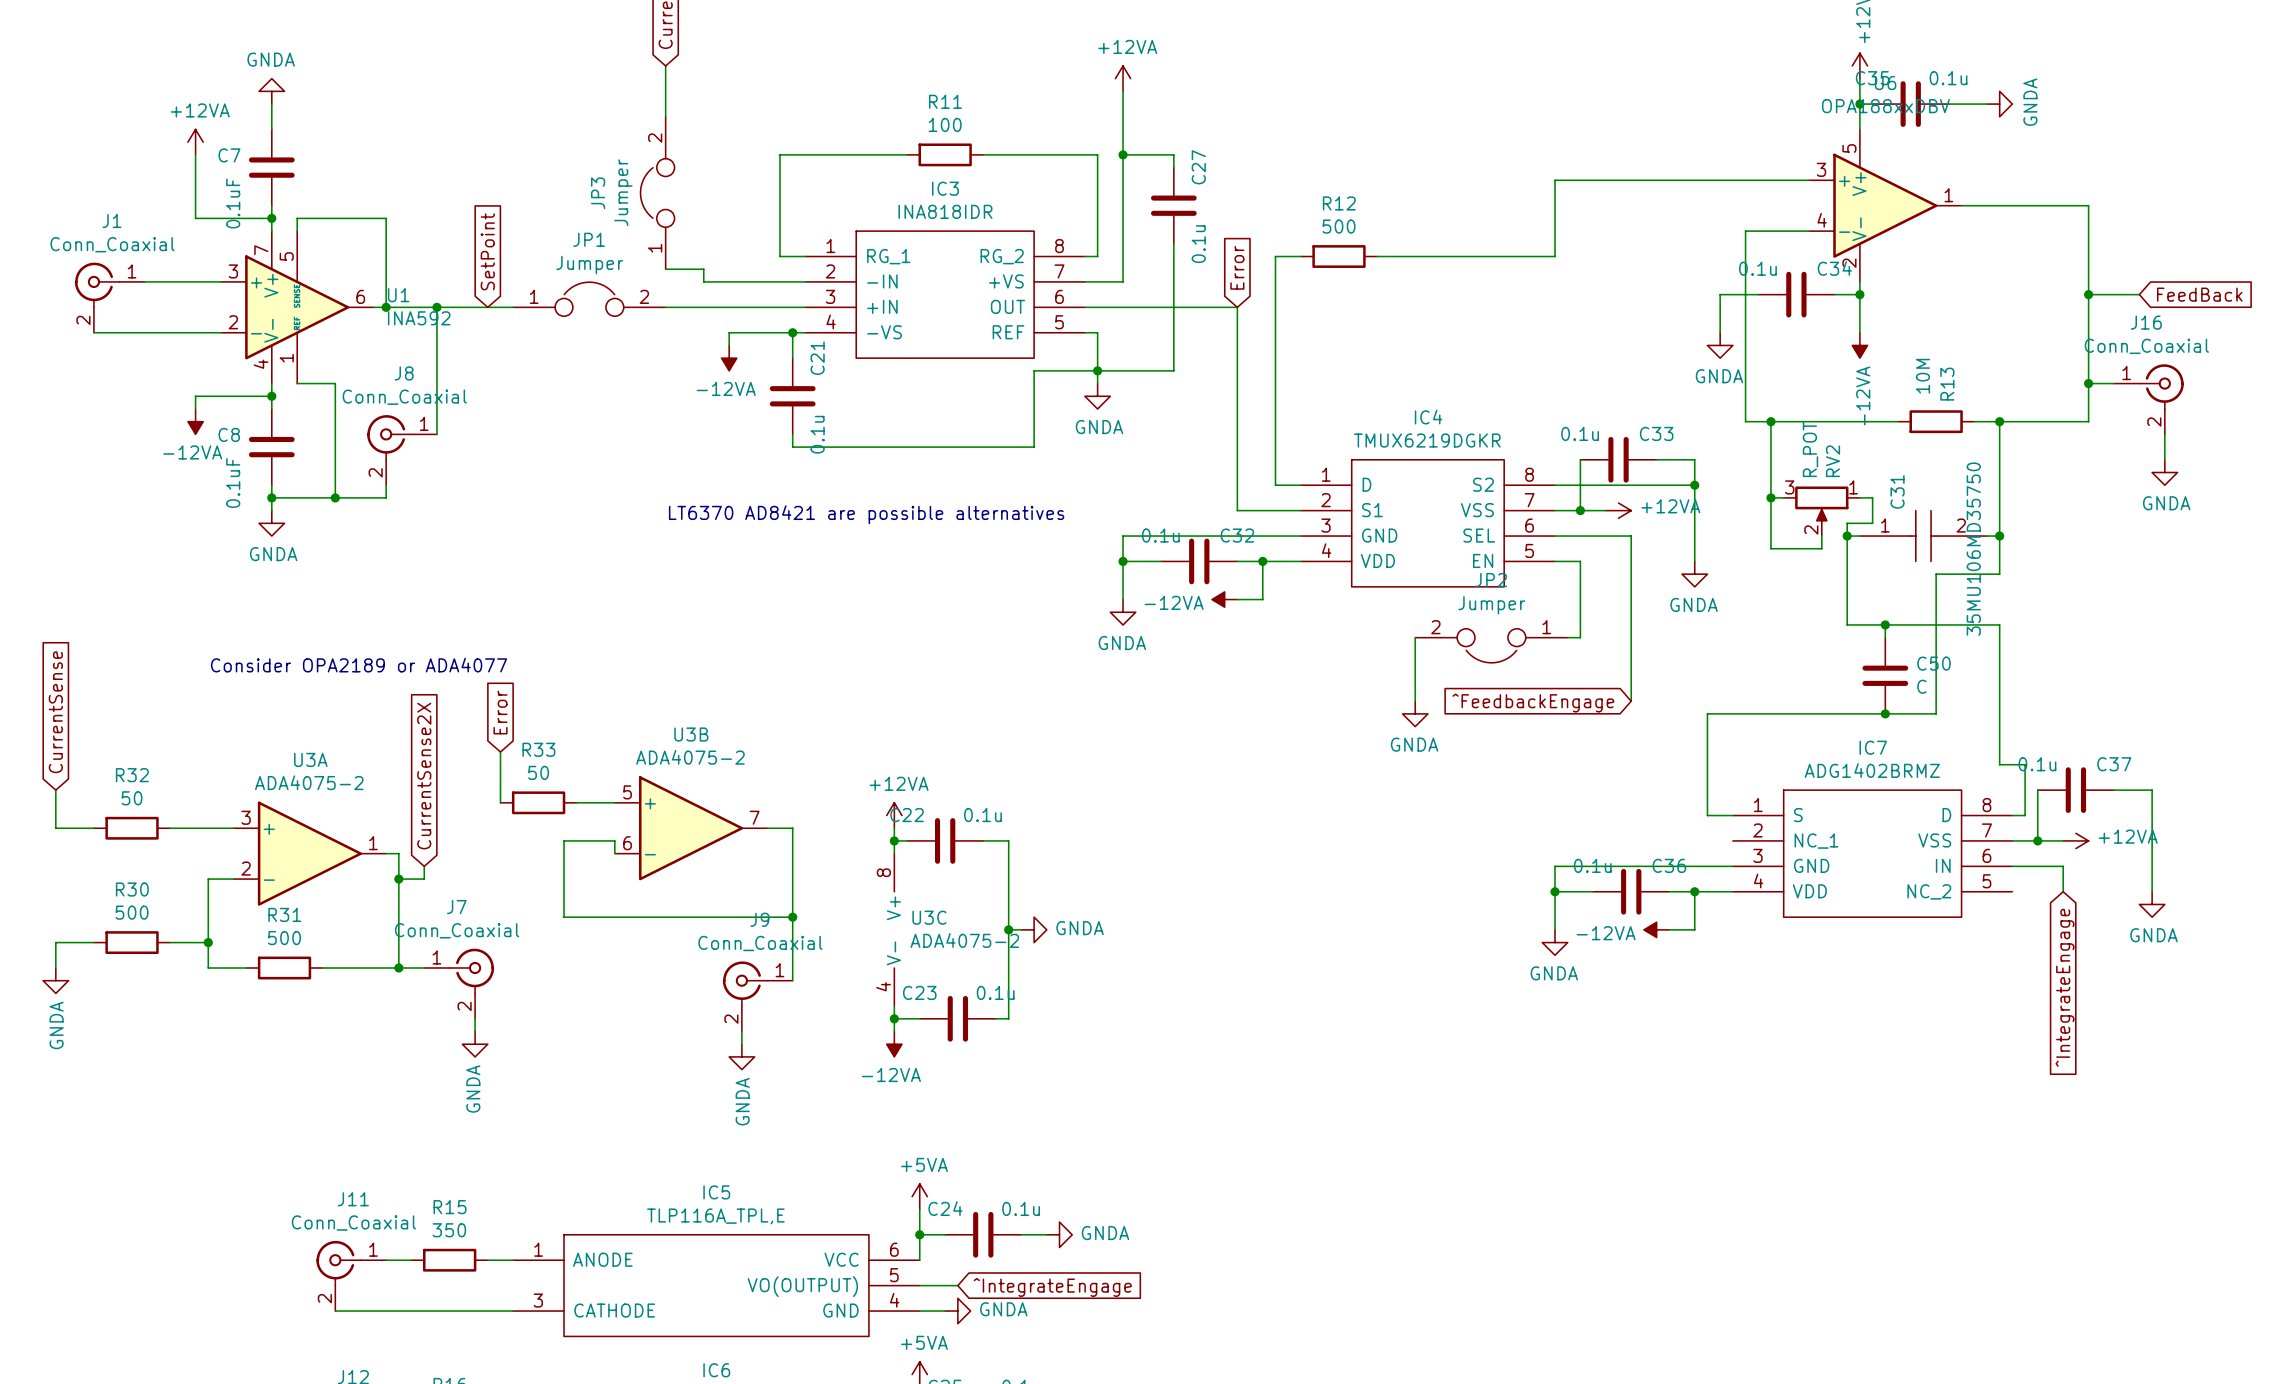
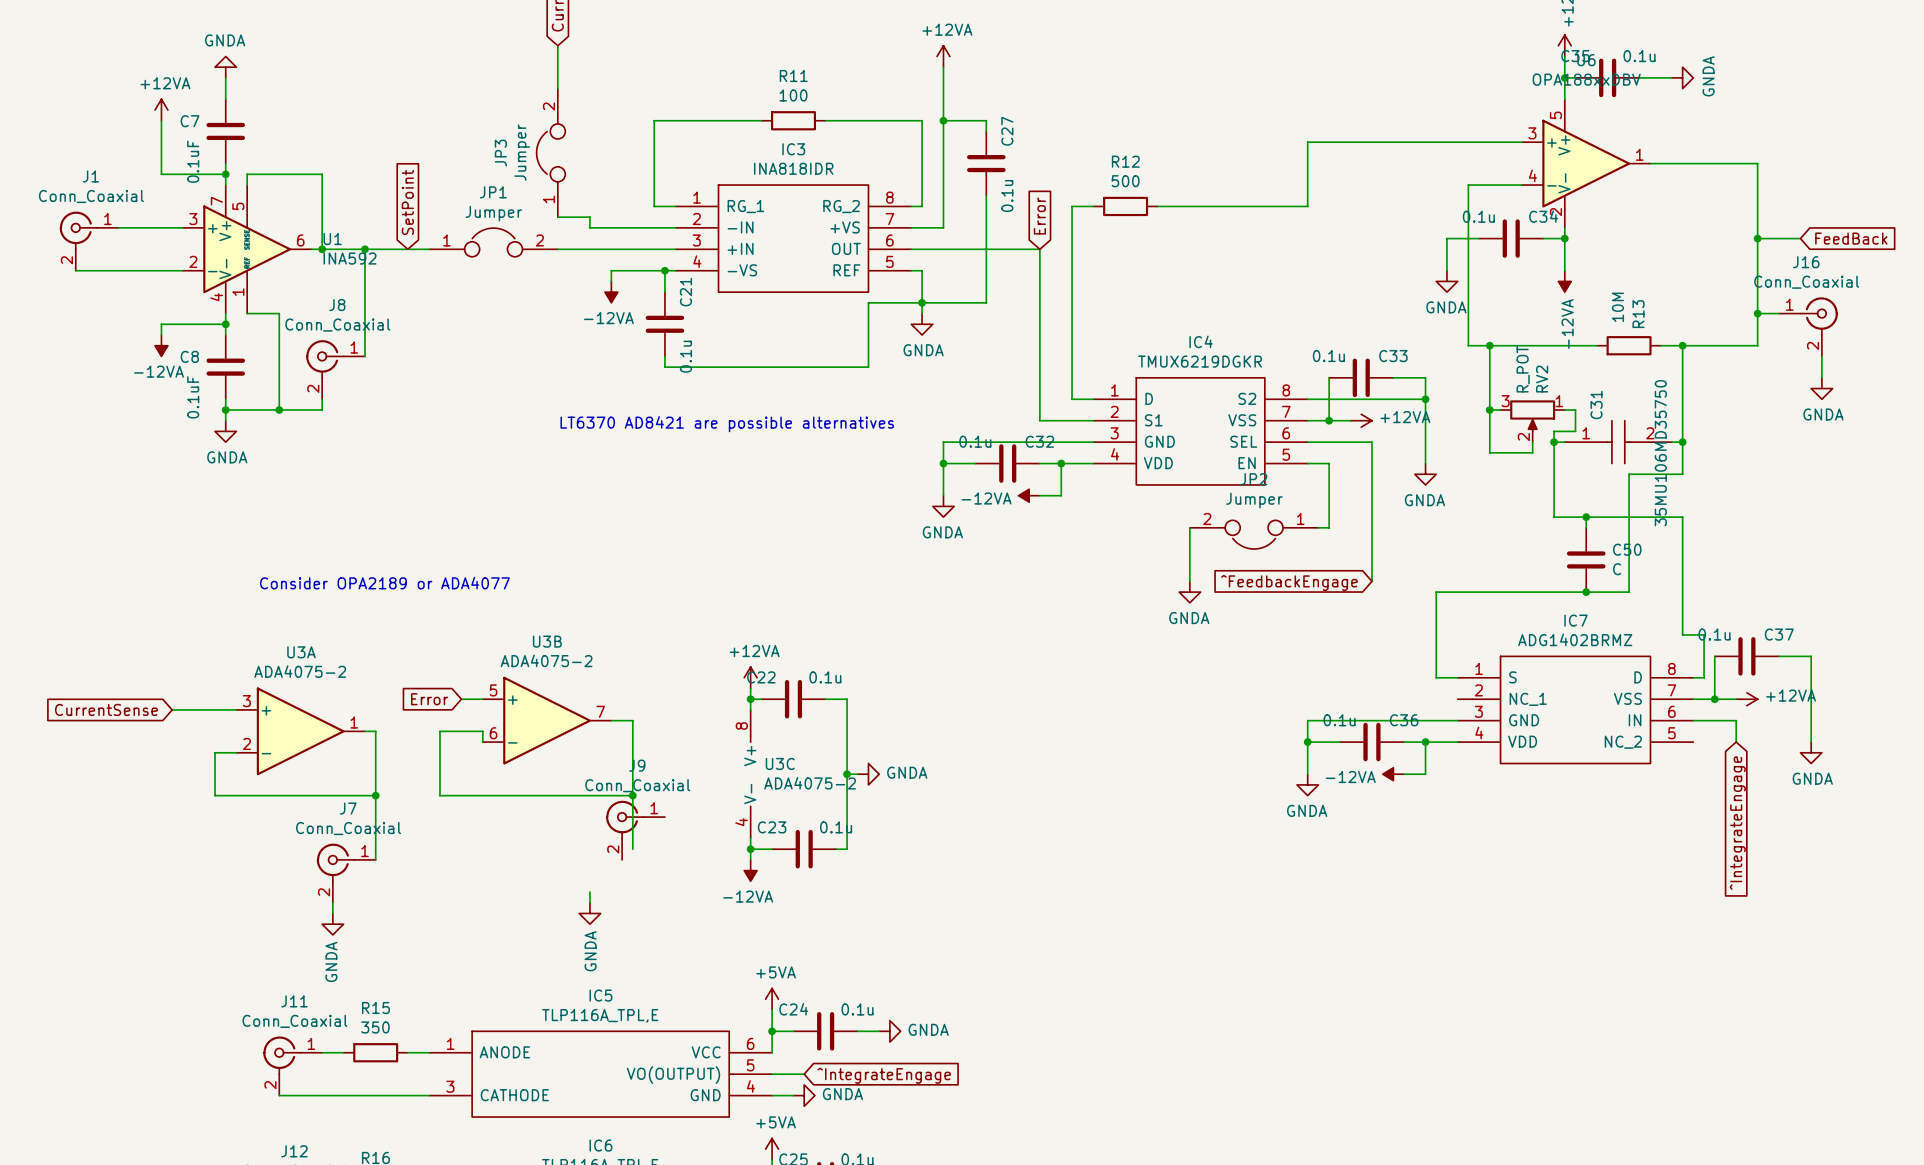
text position: Consider OPA2189 or ADA4077 (359, 665) -> Consider OPA2189 or ADA4077 (384, 583)
global label rotation: 0° (55, 712) -> 90° counterclockwise (106, 709)
global label rotation: 0° (500, 712) -> 90° counterclockwise (429, 699)
global label position: Error (500, 712) -> Error (429, 699)
wire: (500, 752) (500, 802) -> none
global label: CurrentSense2X (424, 776) -> none
wire: (55, 790) (55, 828) (93, 828) -> none
R33: 50 (538, 802) -> none
wire: (576, 802) (614, 802) -> none
R32: 50 (132, 828) -> none
wire: (170, 828) (233, 828) -> none
U3B position: (691, 828) -> (547, 720)
wire: (767, 828) (792, 828) (792, 980) -> (611, 720) (632, 720) (632, 849)
wire: (564, 840) (564, 917) (792, 917) -> (472, 699) (461, 699)
wire: none -> (172, 709) (236, 709)
U3A position: (309, 853) -> (300, 731)
wire: (386, 853) (398, 853) (398, 967) -> none
wire: (233, 879) (208, 879) (208, 967) (246, 967) -> none
junction: (398, 879) -> none
wire: none -> (364, 731) (375, 731) (375, 859)
wire: none -> (482, 742) (482, 731) (439, 731) (439, 795) (632, 795)
wire: none -> (236, 752) (215, 752) (215, 795) (375, 795)
junction position: (792, 917) -> (632, 795)
wire: (93, 942) (55, 942) (55, 967) -> none
R30: 500 (132, 942) -> none
wire: (170, 942) (208, 942) -> none
junction: (208, 942) -> none
junction: none -> (375, 795)
R31: 500 (284, 967) -> none
wire: (322, 967) (424, 967) -> none
junction: (398, 967) -> none
J7 flip: as is (471, 971) -> left-right (335, 862)
power symbol: GNDA (55, 980) -> none
J7 position: (459, 983) -> (346, 873)
wire: (475, 1018) (475, 1031) -> (332, 902) (332, 913)
wire: (741, 1031) (741, 1044) -> (589, 892) (589, 902)
power symbol position: GNDA (475, 1044) -> GNDA (332, 924)
power symbol position: GNDA (741, 1056) -> GNDA (589, 913)

